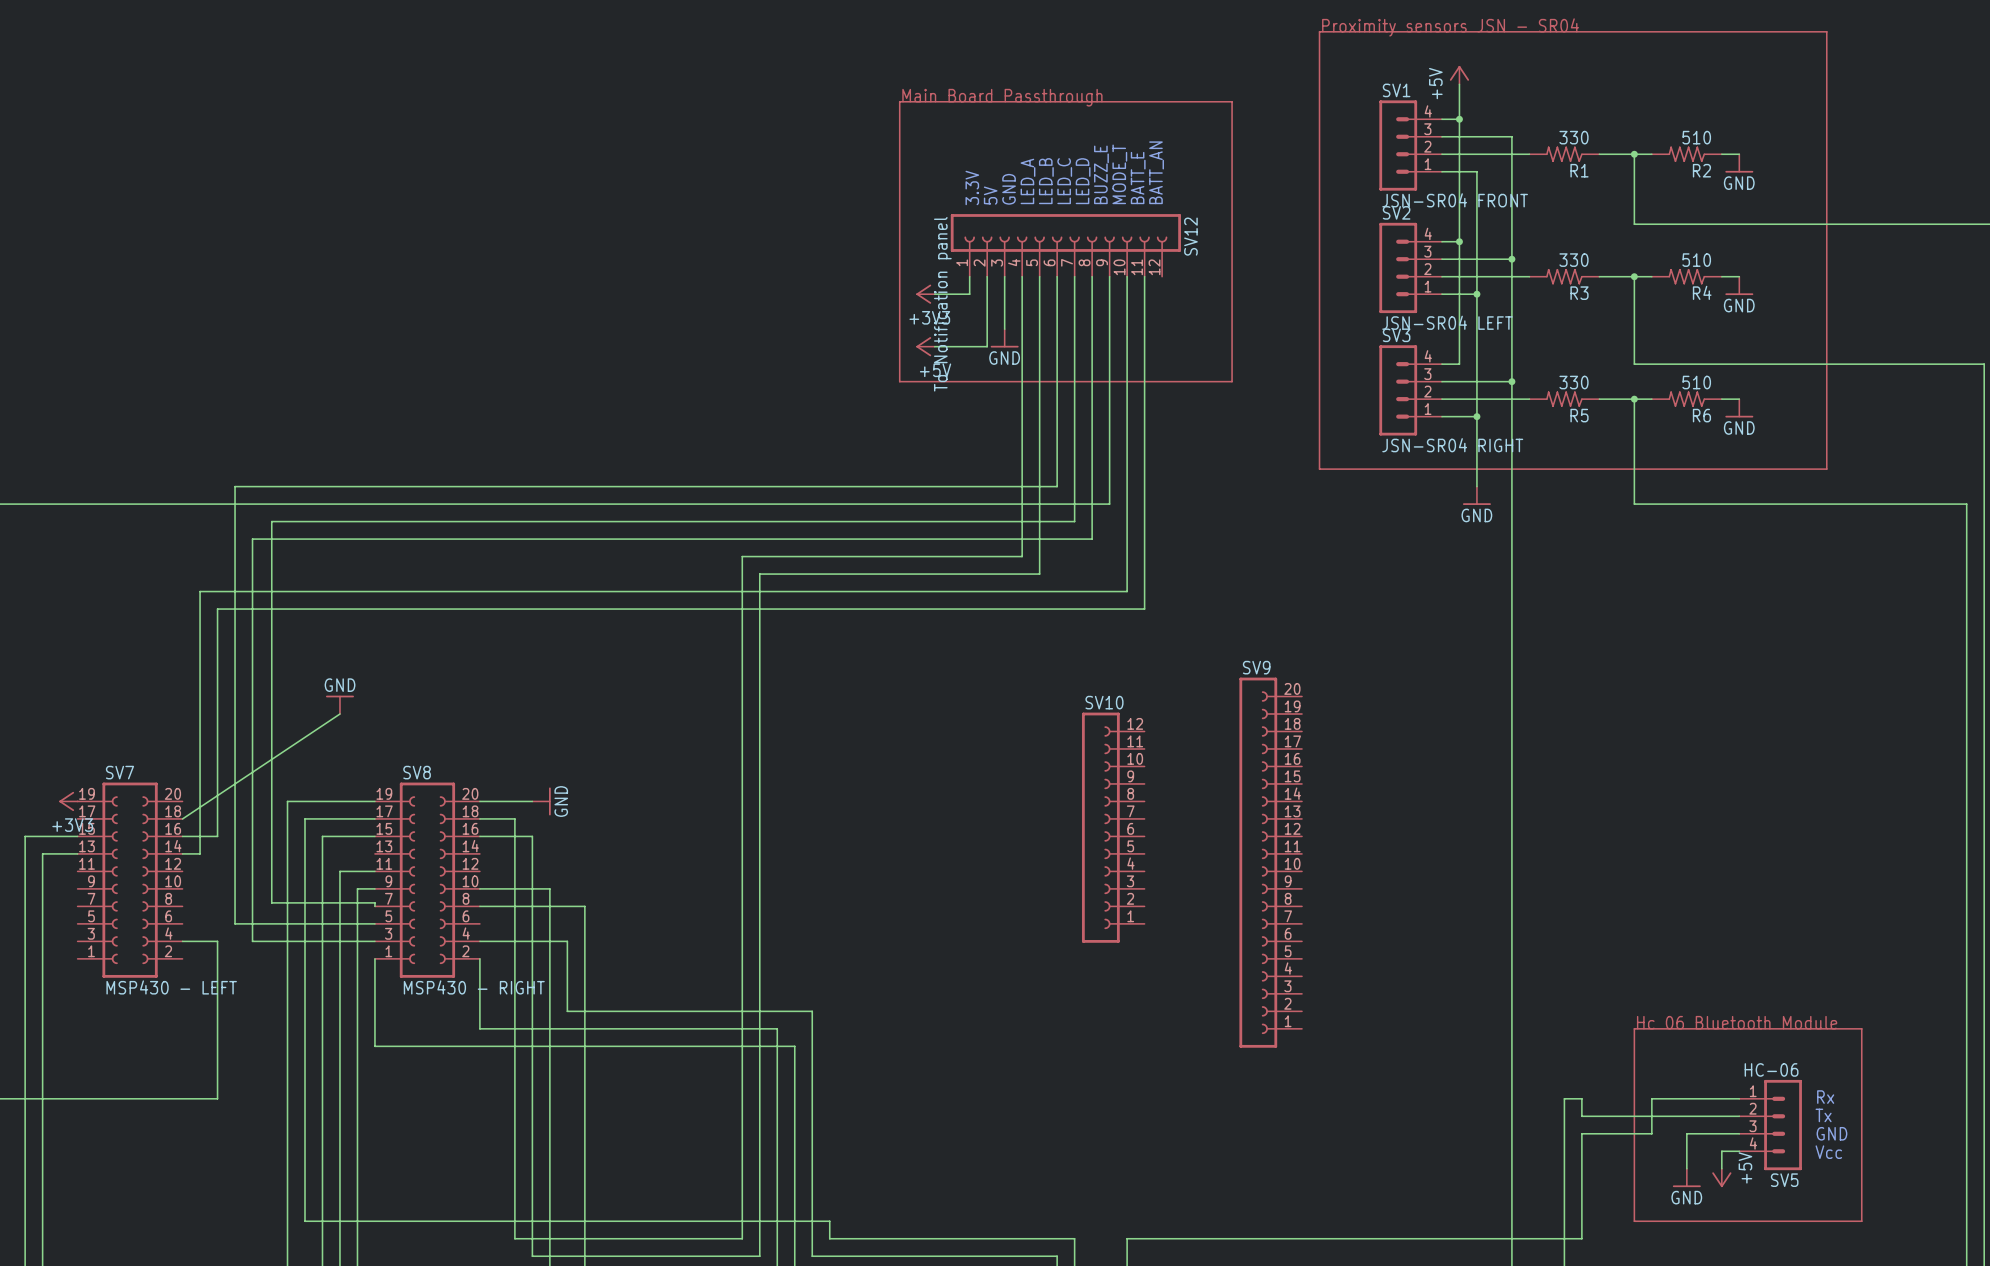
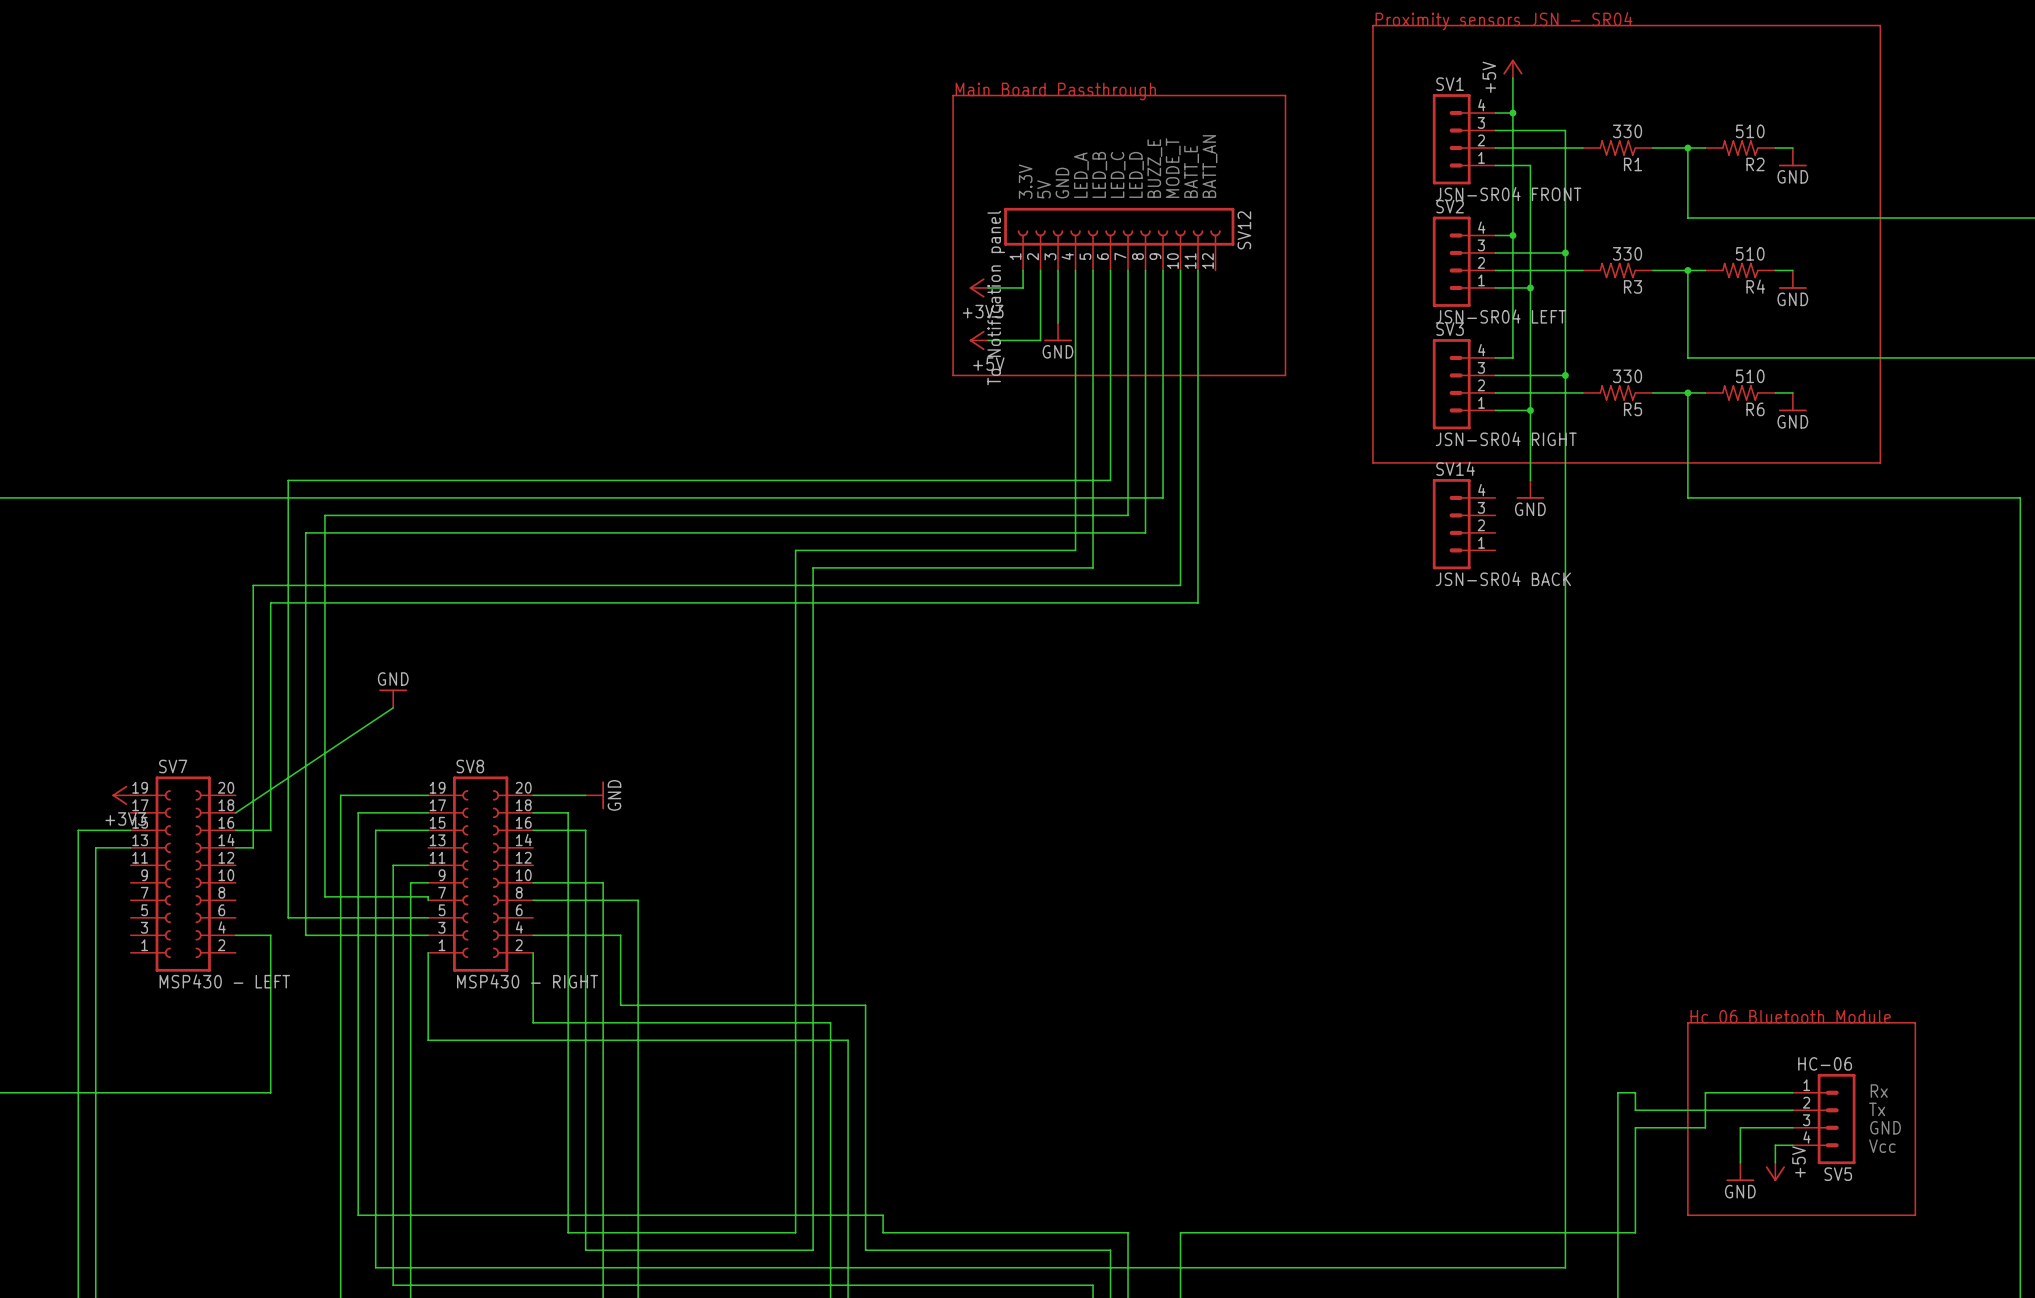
SV14: none -> JSN-SR04 BACK (1464, 524)
SV10: (1113, 827) -> none
SV9: (1270, 862) -> none

